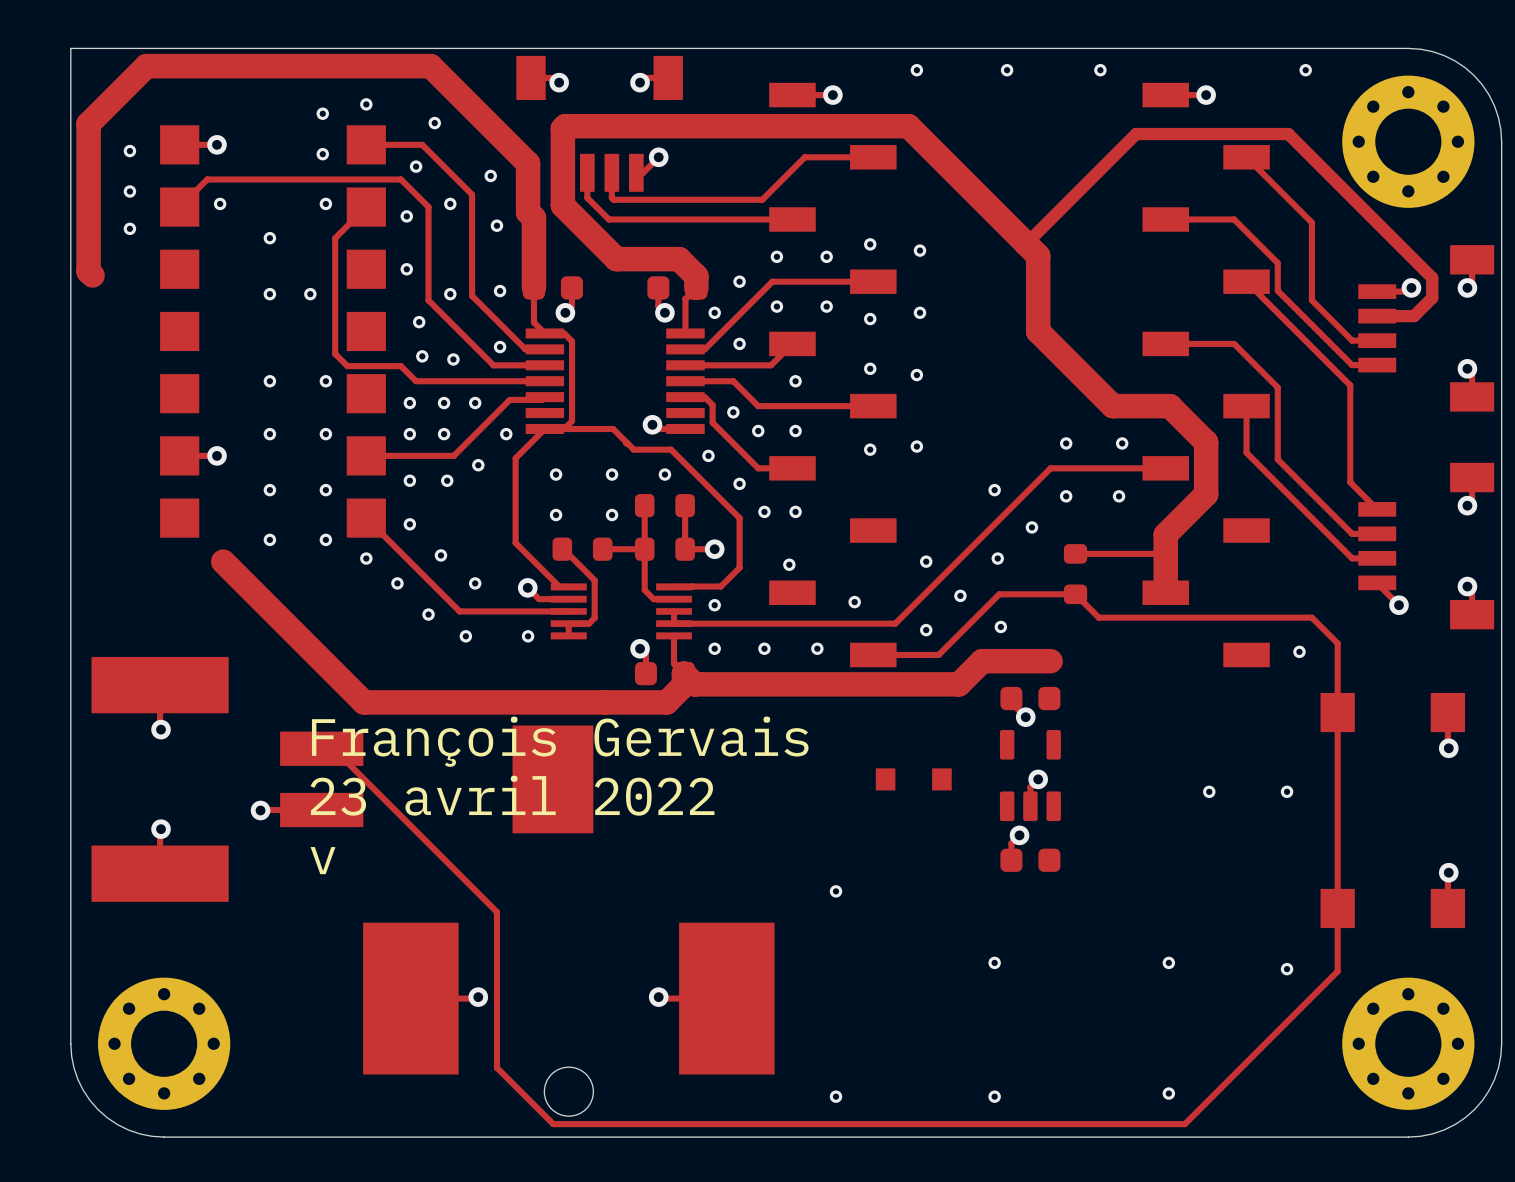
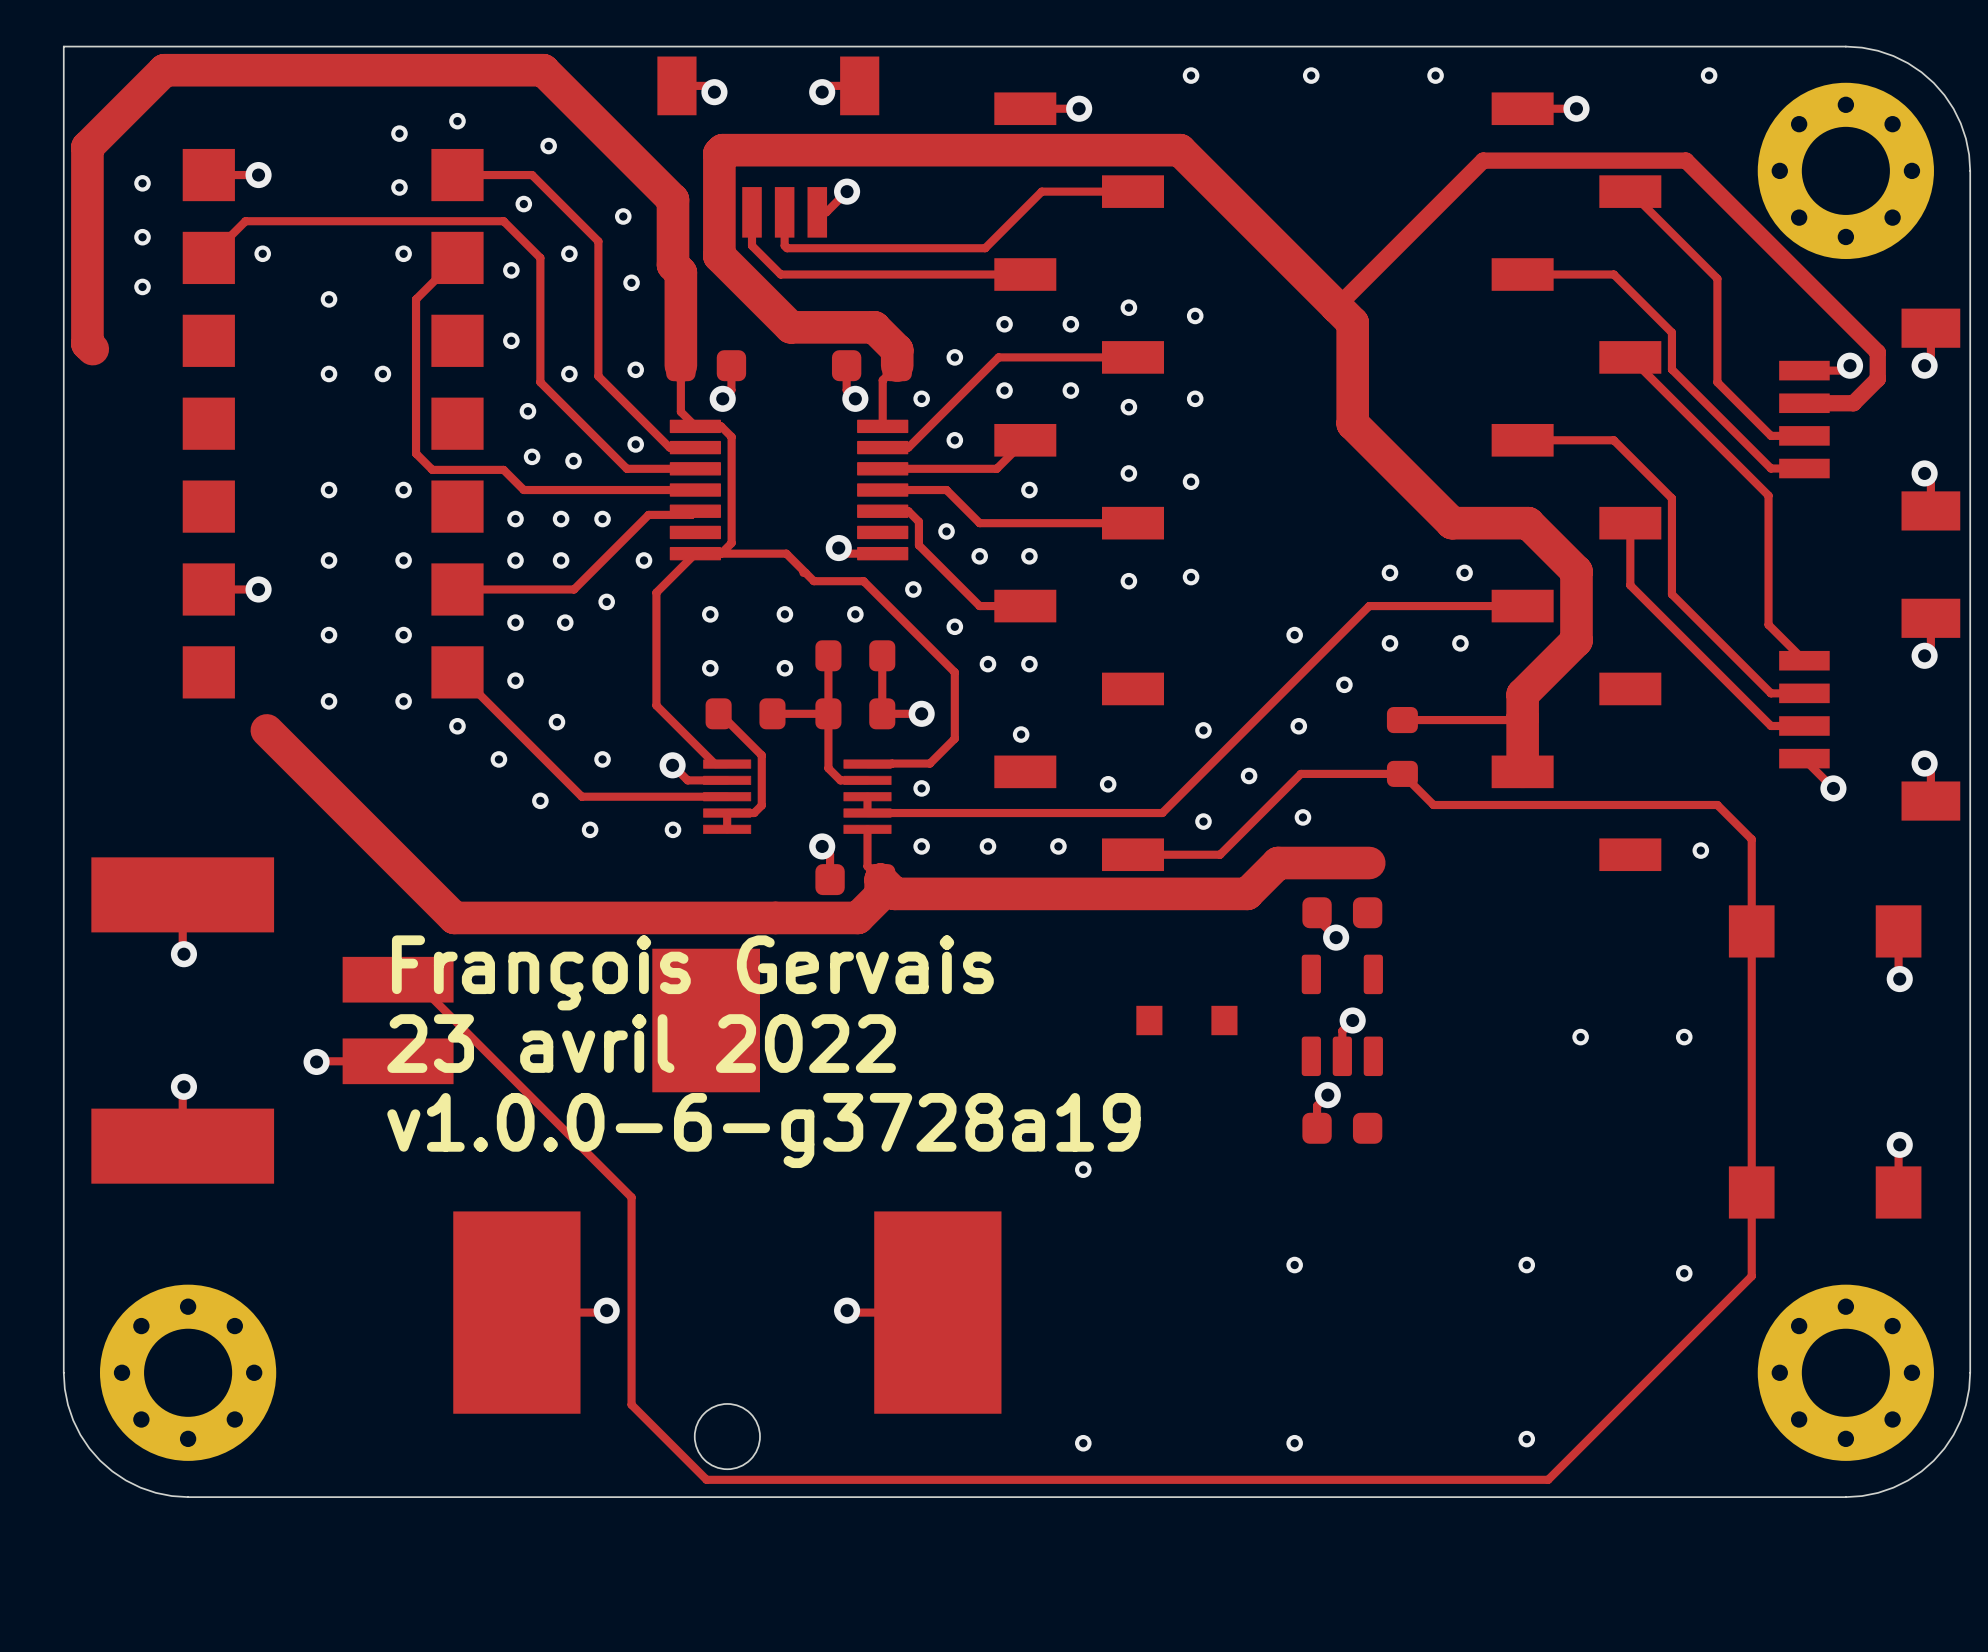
text: v (323, 860) -> v1.0.0-6-g3728a19 (763, 1130)

